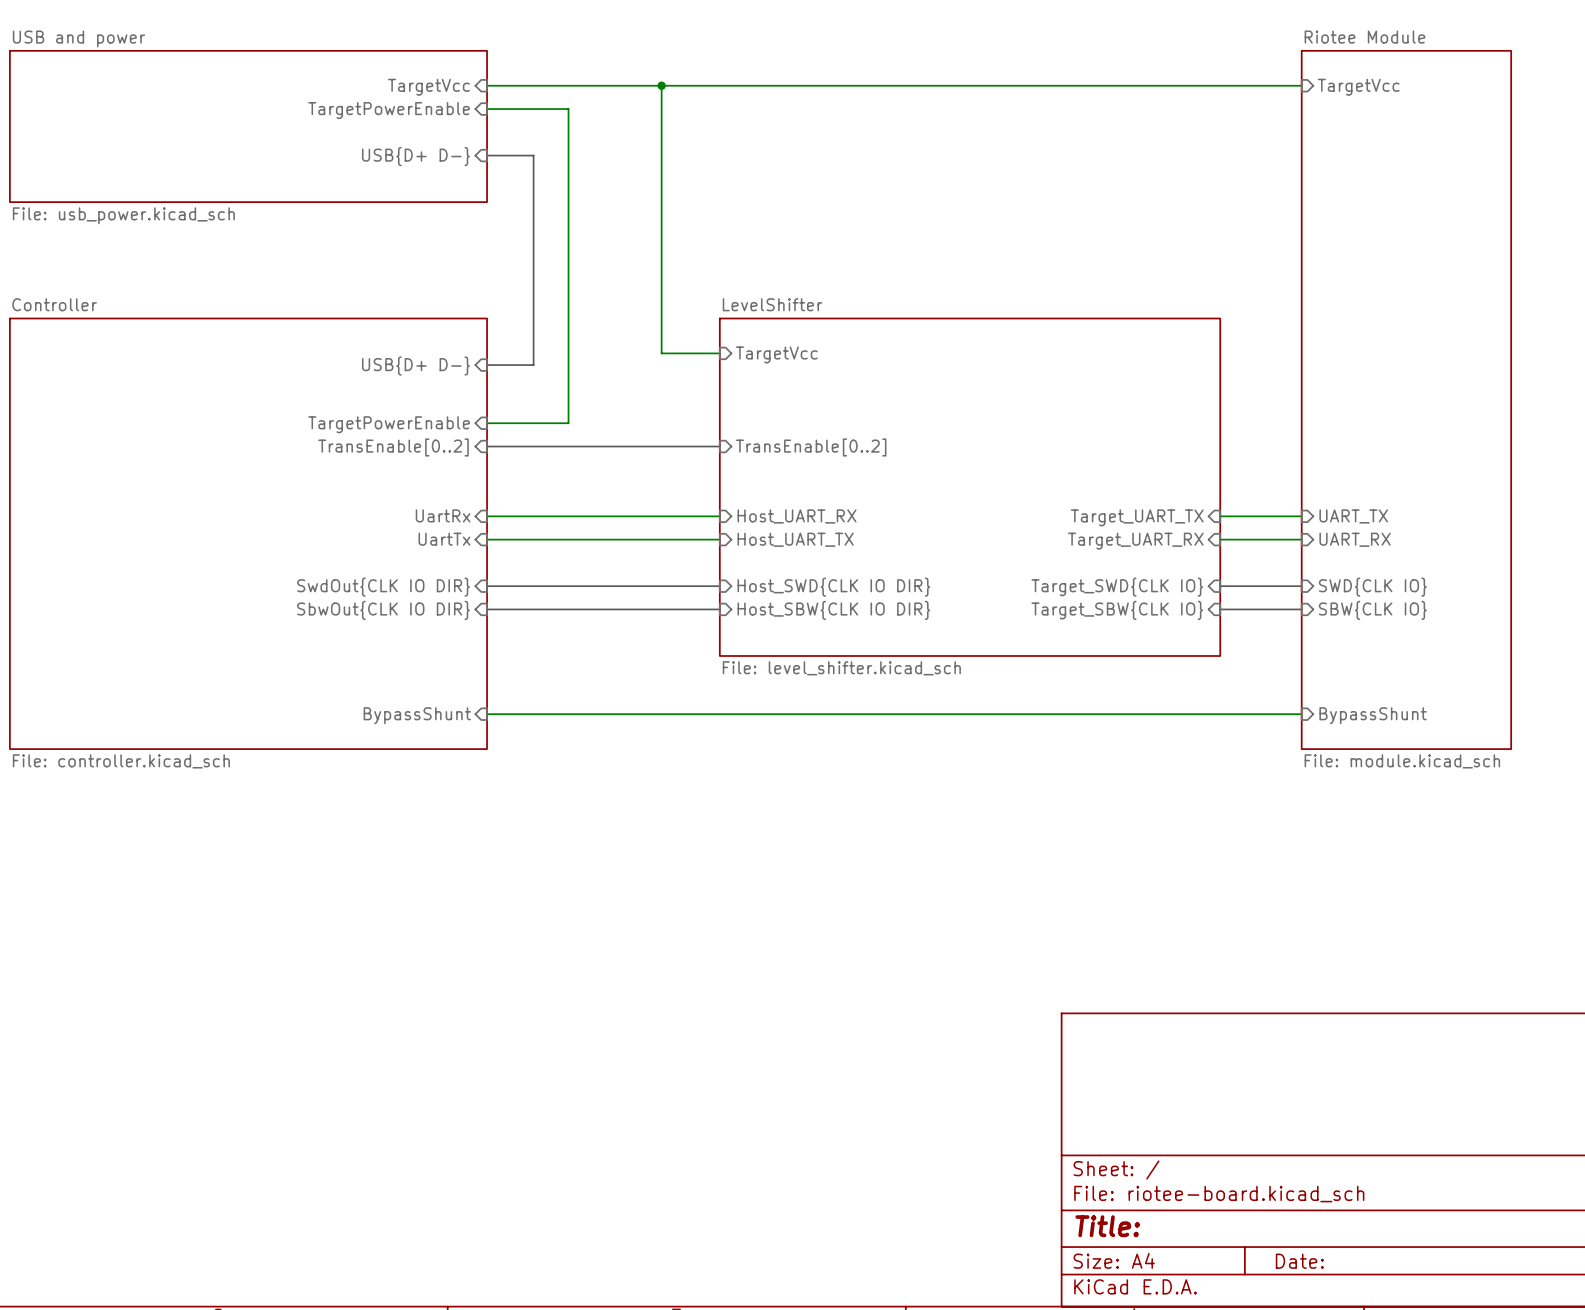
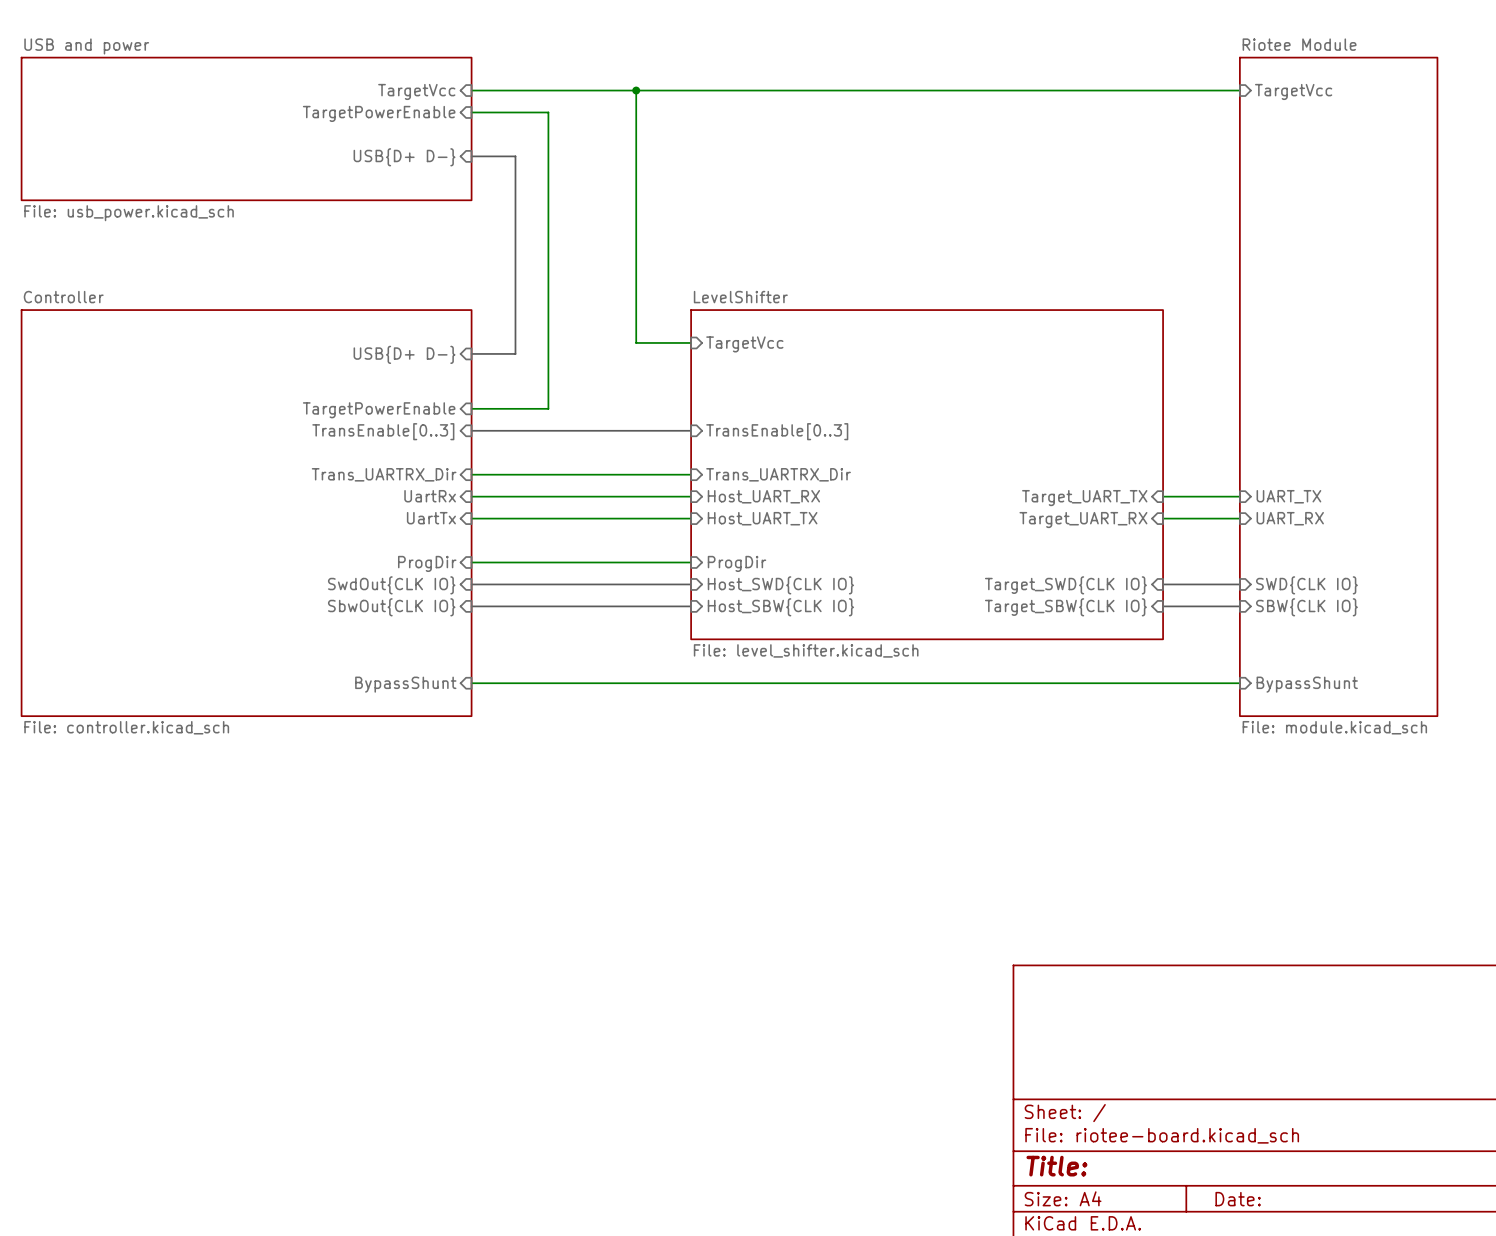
sheet LevelShifter shape: [719, 317, 1221, 657] -> [690, 309, 1164, 640]
sheet pin: TransEnable[0..2] (393, 447) -> TransEnable[0..3] (383, 431)
sheet pin: TransEnable[0..2] (811, 447) -> TransEnable[0..3] (777, 431)
sheet pin: none -> Trans_UARTRX_Dir (384, 474)
wire: none -> (471, 474) (691, 474)
sheet pin: none -> Trans_UARTRX_Dir (778, 474)
bus: (487, 586) (719, 586) -> (471, 606) (691, 606)
bus: (1220, 586) (1301, 586) -> (1163, 606) (1239, 606)
sheet pin: SwdOut{CLK IO DIR} (383, 587) -> ProgDir (427, 563)
sheet pin: Host_SWD{CLK IO DIR} (833, 587) -> ProgDir (737, 563)
sheet pin: Target_SWD{CLK IO} (1117, 587) -> none
sheet pin: SWD{CLK IO} (1372, 587) -> none
sheet pin: SbwOut{CLK IO DIR} (383, 610) -> SwdOut{CLK IO} (391, 585)
sheet pin: Host_SBW{CLK IO DIR} (833, 610) -> Host_SWD{CLK IO} (780, 585)
sheet pin: Target_SBW{CLK IO} (1117, 610) -> Target_SWD{CLK IO} (1065, 585)
sheet pin: SBW{CLK IO} (1372, 610) -> SWD{CLK IO} (1306, 585)
sheet pin: none -> SbwOut{CLK IO} (391, 607)
sheet pin: none -> Host_SBW{CLK IO} (780, 607)
sheet pin: none -> Target_SBW{CLK IO} (1065, 607)
sheet pin: none -> SBW{CLK IO} (1306, 607)

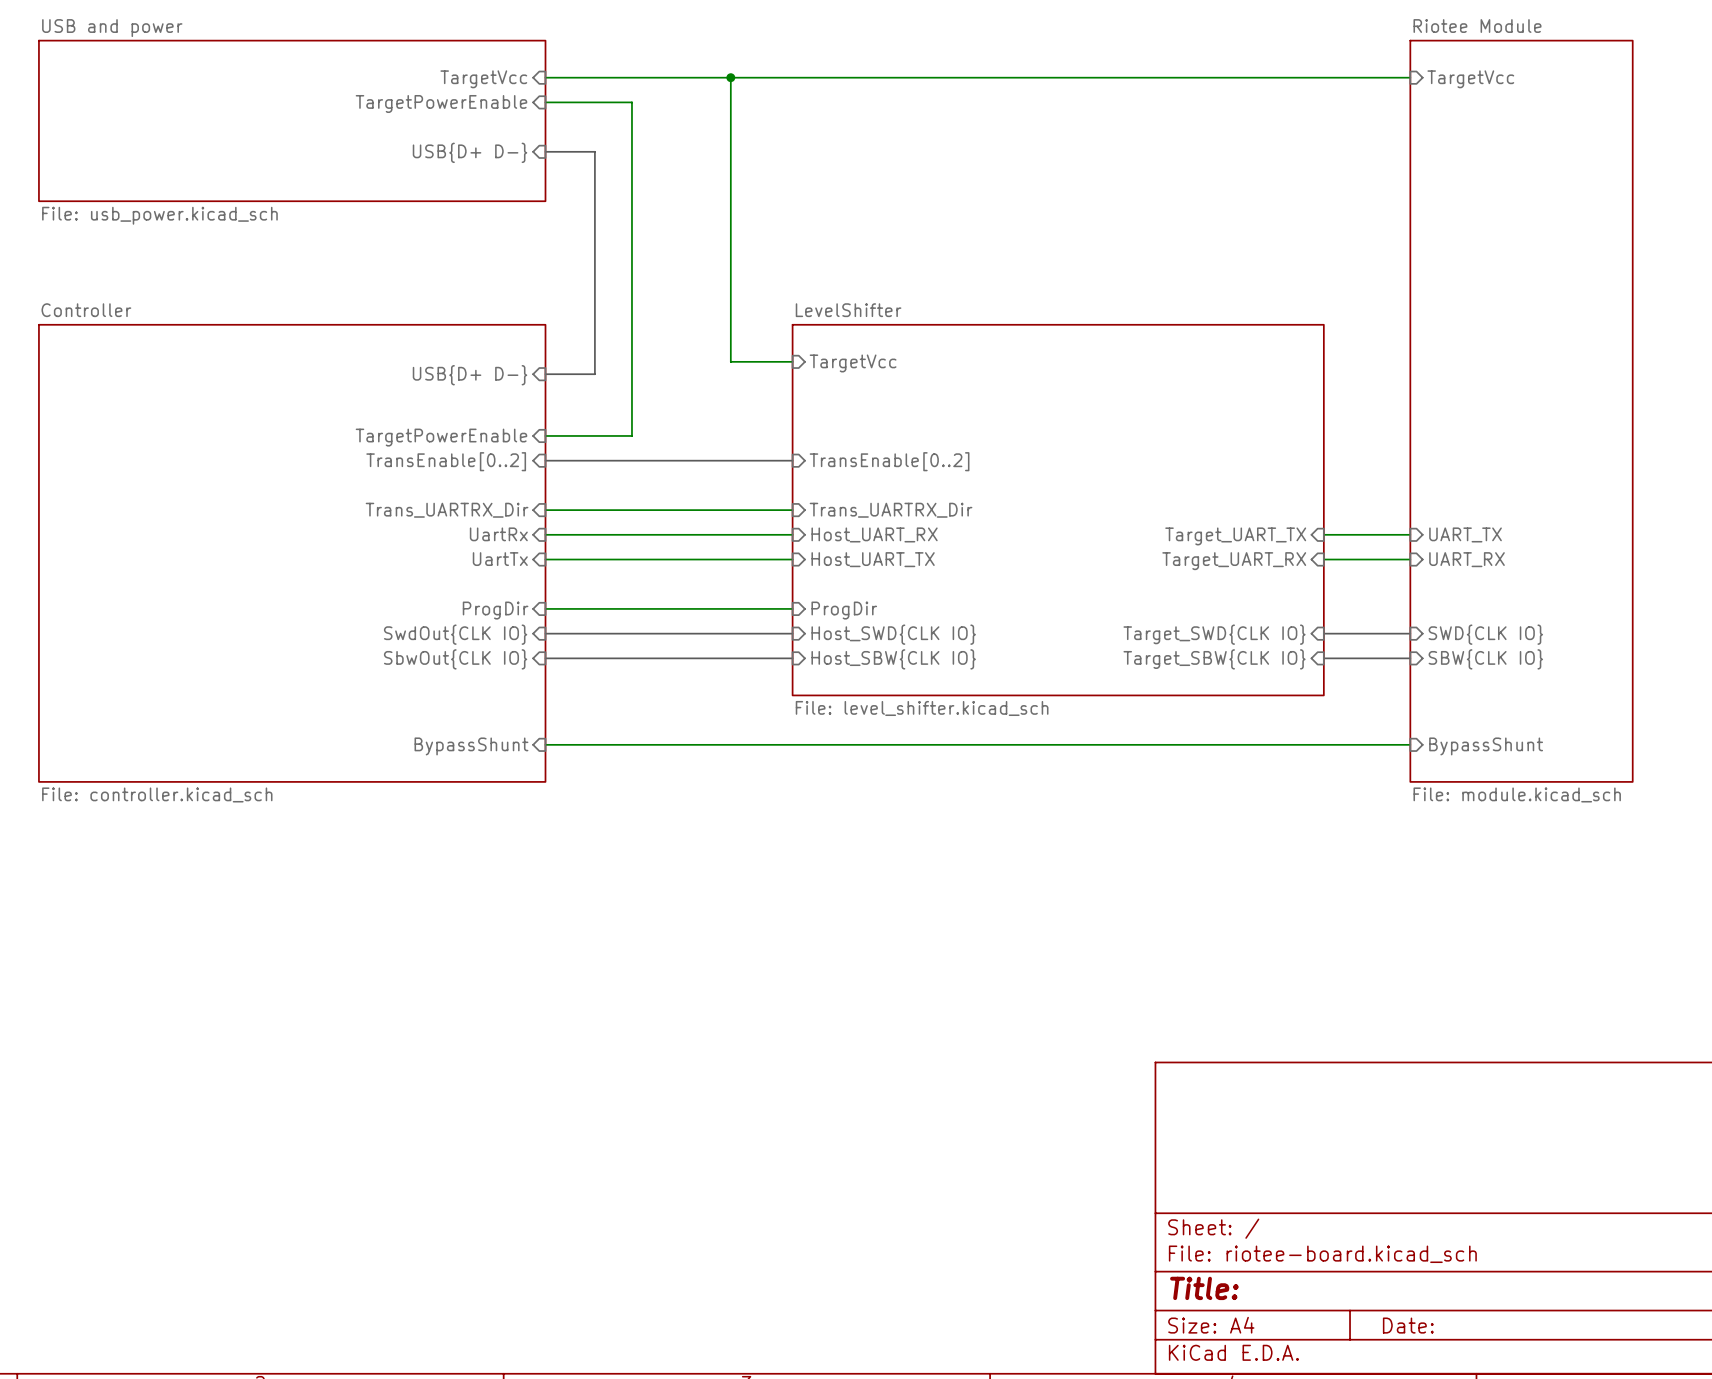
sheet pin: TransEnable[0..3] (383, 431) -> TransEnable[0..2] (446, 461)
sheet pin: TransEnable[0..3] (777, 431) -> TransEnable[0..2] (889, 461)

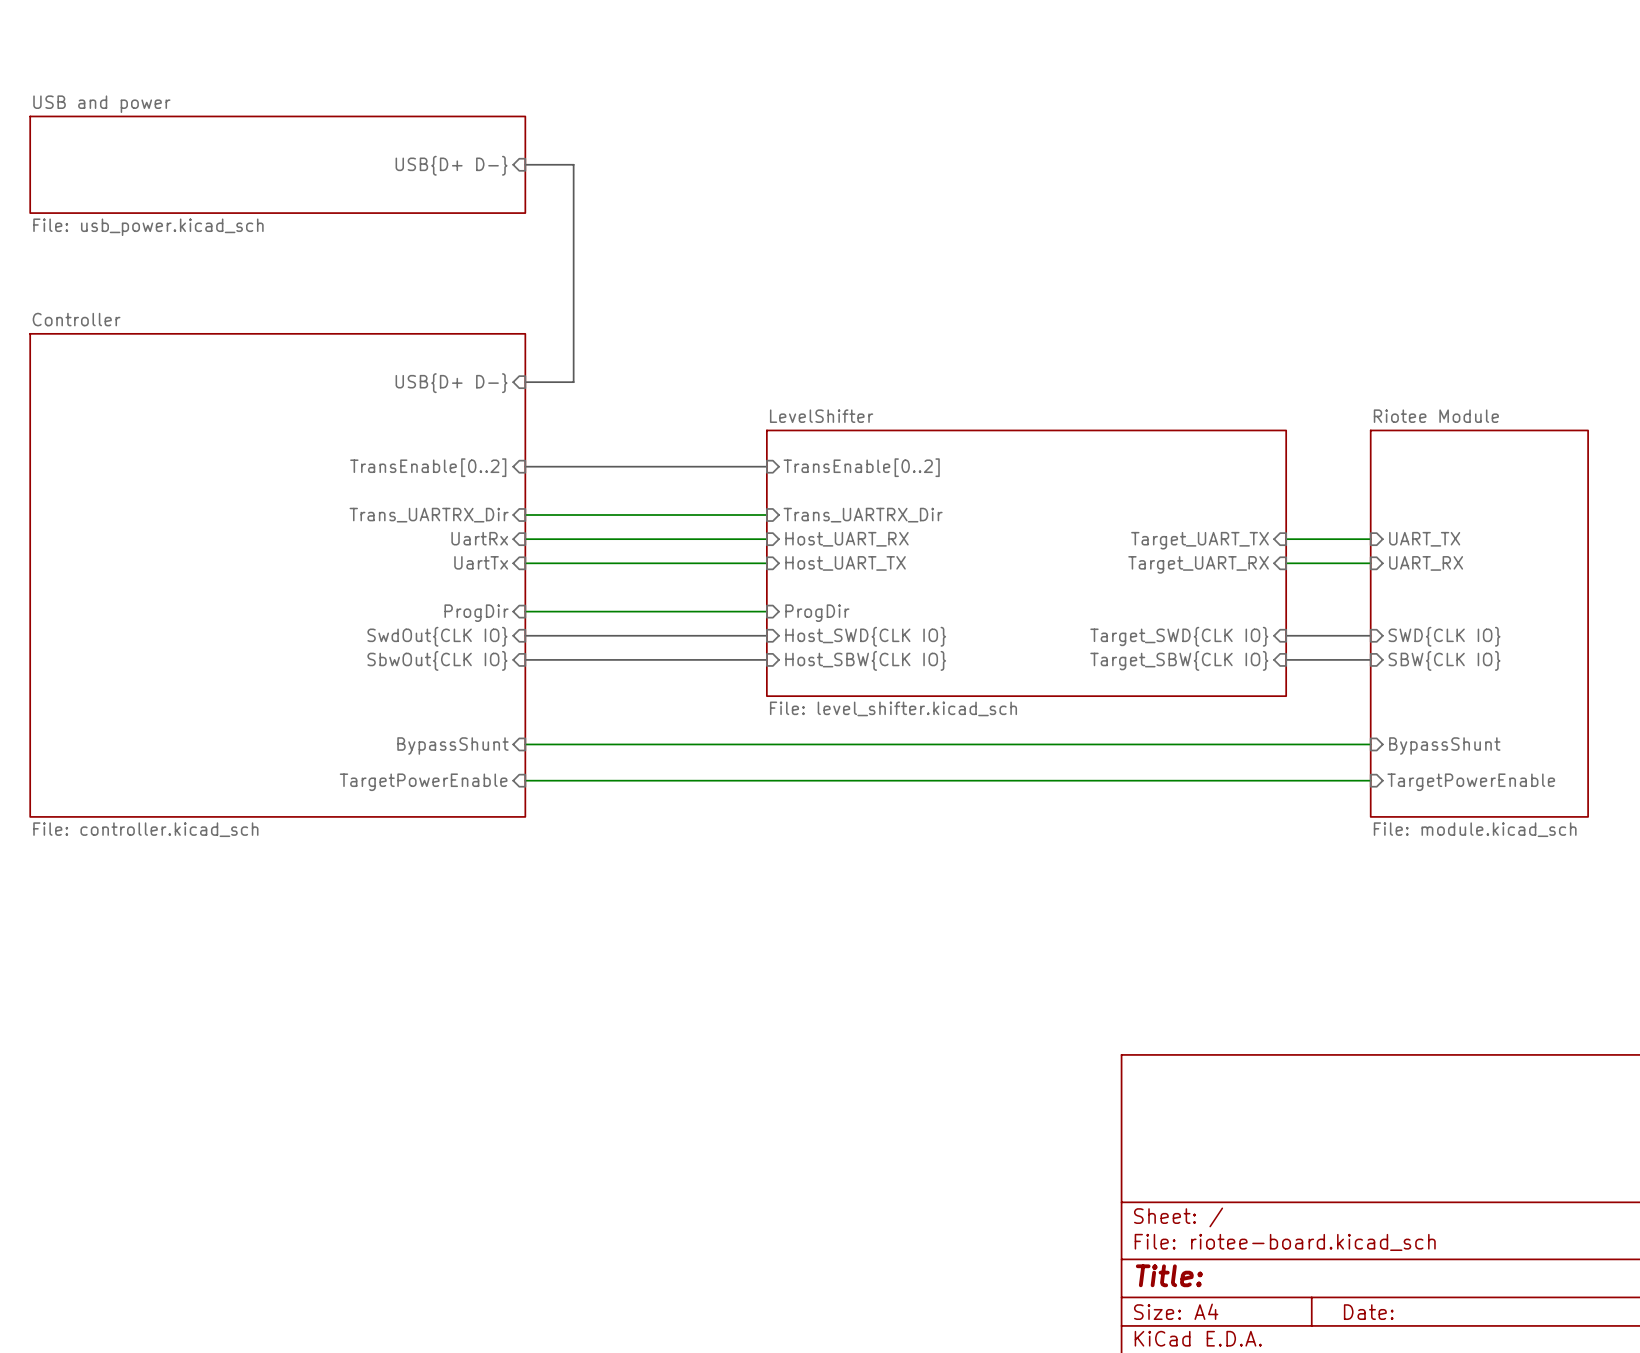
wire: (545, 77) (1410, 77) -> none
wire: (730, 77) (730, 361) (792, 361) -> none
junction: (730, 77) -> none
sheet pin: TargetVcc (483, 79) -> none
sheet pin: TargetVcc (1470, 79) -> none
wire: (545, 102) (631, 102) (631, 435) (545, 435) -> none
sheet pin: TargetPowerEnable (441, 104) -> none
sheet USB and power: File: usb_power.kicad_sch (292, 120) -> none
sheet USB and power: none -> File: usb_power.kicad_sch (277, 164)
sheet pin: TargetVcc (853, 363) -> none
sheet Riotee Module: File: module.kicad_sch (1521, 411) -> none
sheet pin: TargetPowerEnable (441, 437) -> none
sheet LevelShifter: File: level_shifter.kicad_sch (1058, 510) -> none
sheet Controller: File: controller.kicad_sch (292, 553) -> none
sheet LevelShifter: none -> File: level_shifter.kicad_sch (1026, 563)
sheet Controller: none -> File: controller.kicad_sch (277, 575)
sheet Riotee Module: none -> File: module.kicad_sch (1479, 623)
wire: none -> (525, 780) (1370, 780)
sheet pin: none -> TargetPowerEnable (423, 782)
sheet pin: none -> TargetPowerEnable (1471, 782)

